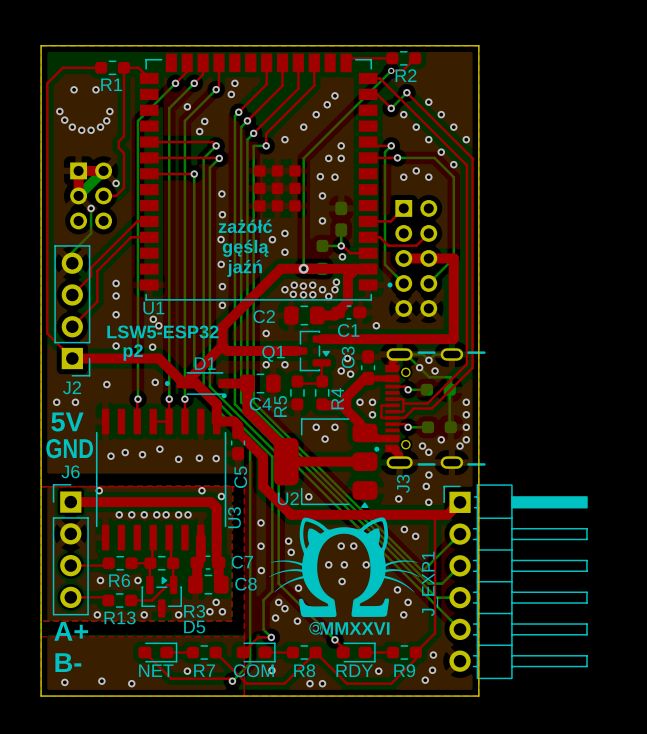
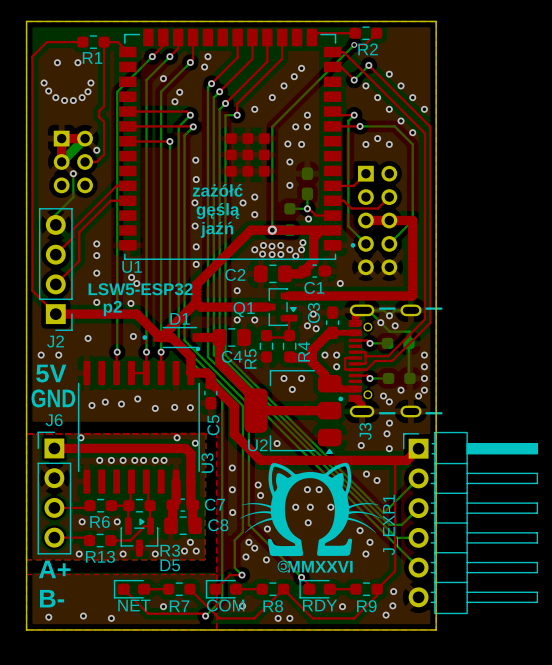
part rotation: 0° (157, 652) -> 180° (132, 589)
part rotation: 0° (256, 652) -> 180° (224, 589)
part rotation: 0° (356, 652) -> 180° (317, 589)

